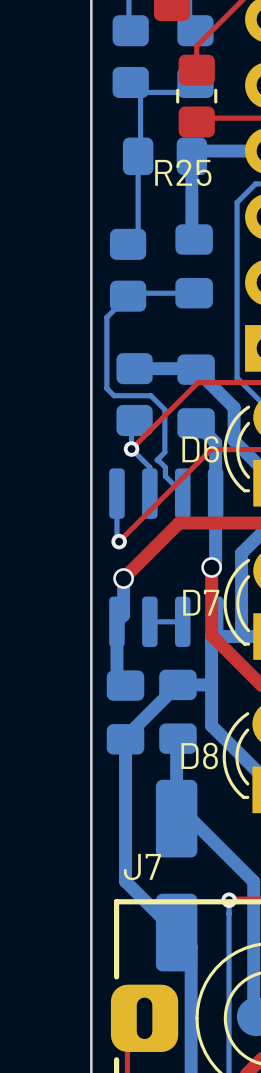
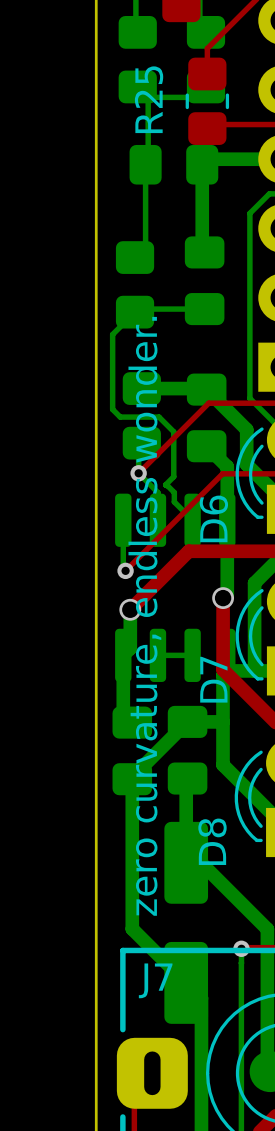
R25 name rotation: 0° (183, 172) -> 90° counterclockwise (149, 99)
D6 name rotation: 0° (200, 449) -> 90° counterclockwise (213, 518)
D7 name rotation: 0° (201, 602) -> 90° counterclockwise (213, 679)
text: none -> zero curvature, endless wonder. (144, 616)
D8 name rotation: 0° (199, 755) -> 90° counterclockwise (212, 841)
J7 name position: J7 (142, 866) -> J7 (155, 980)

